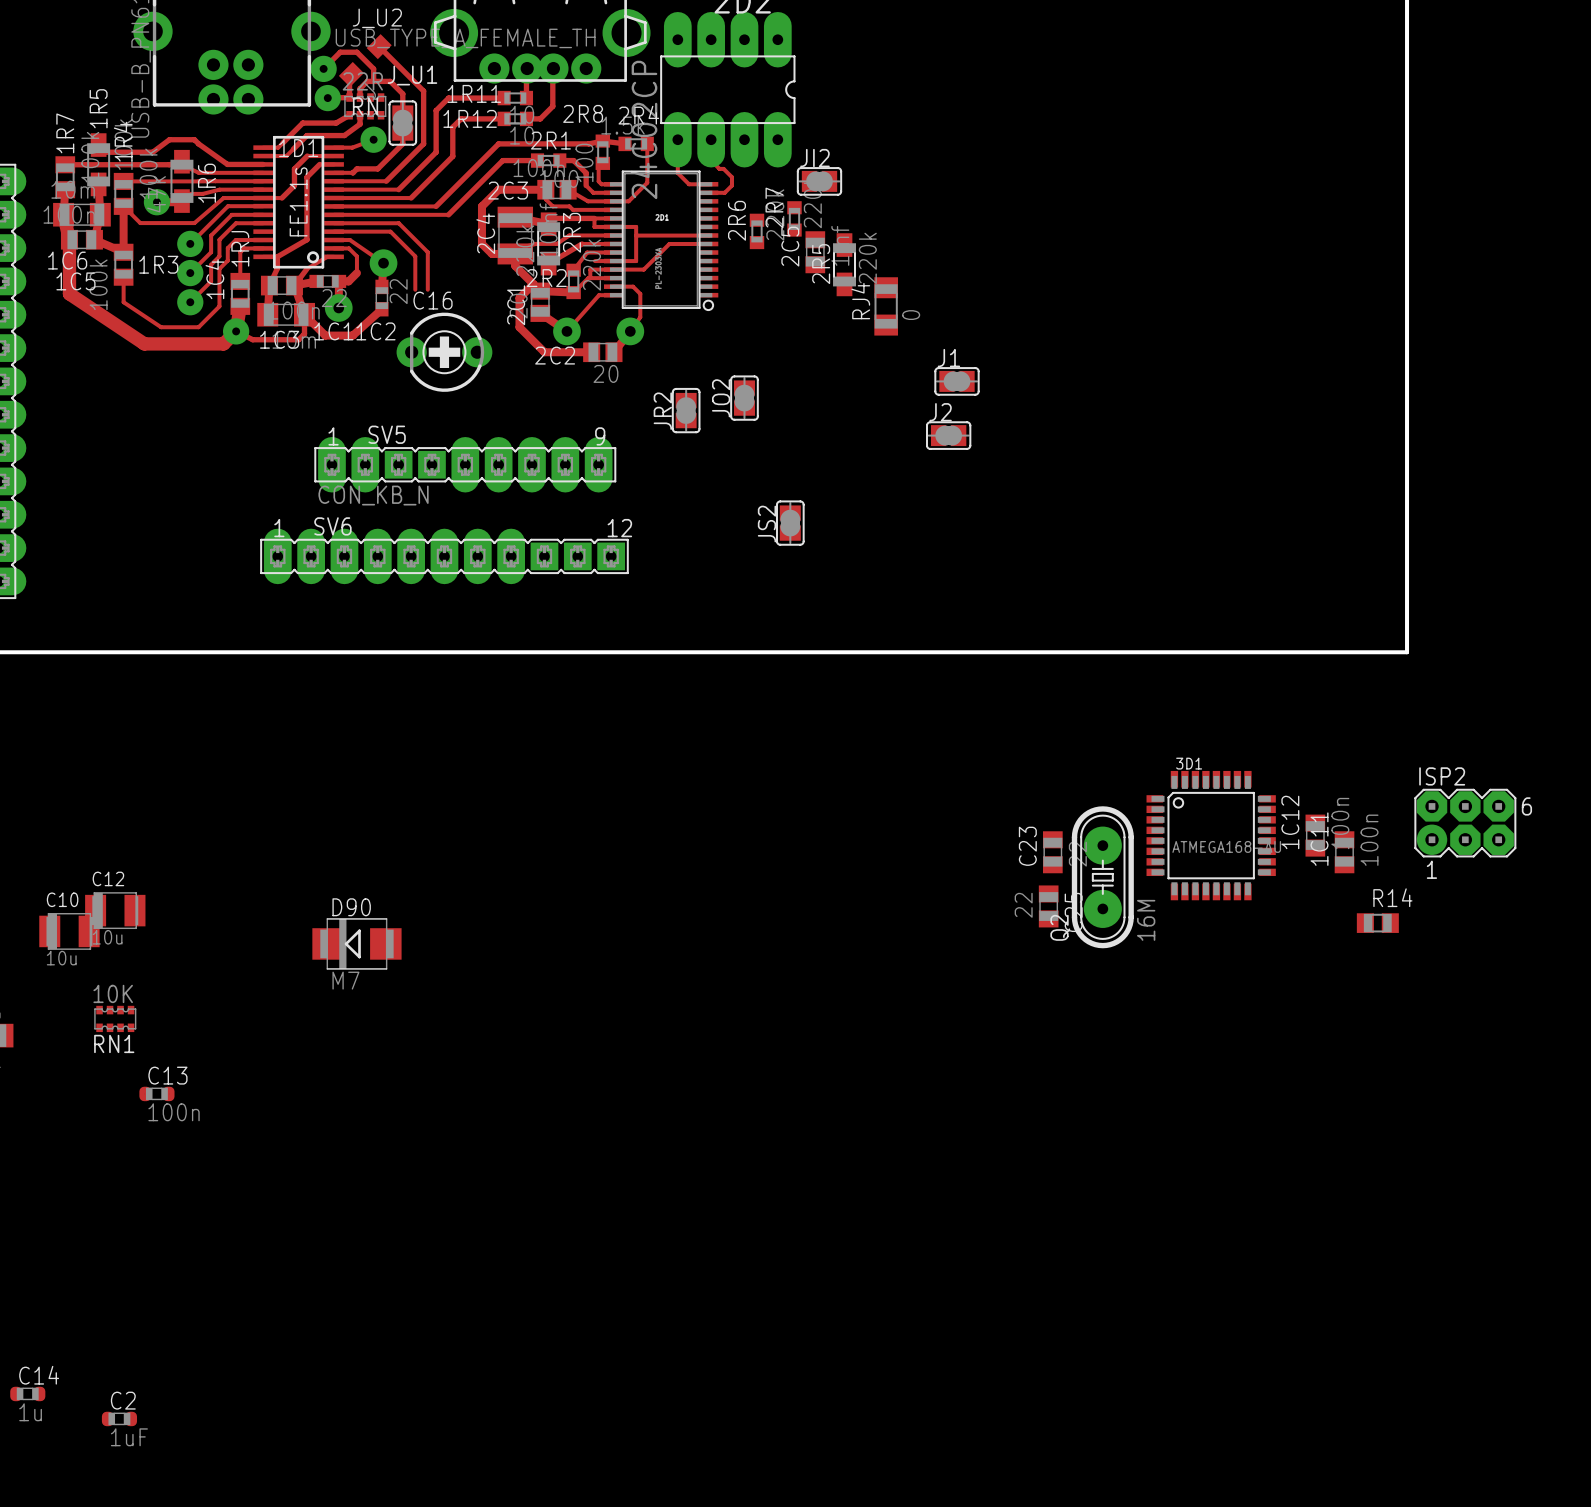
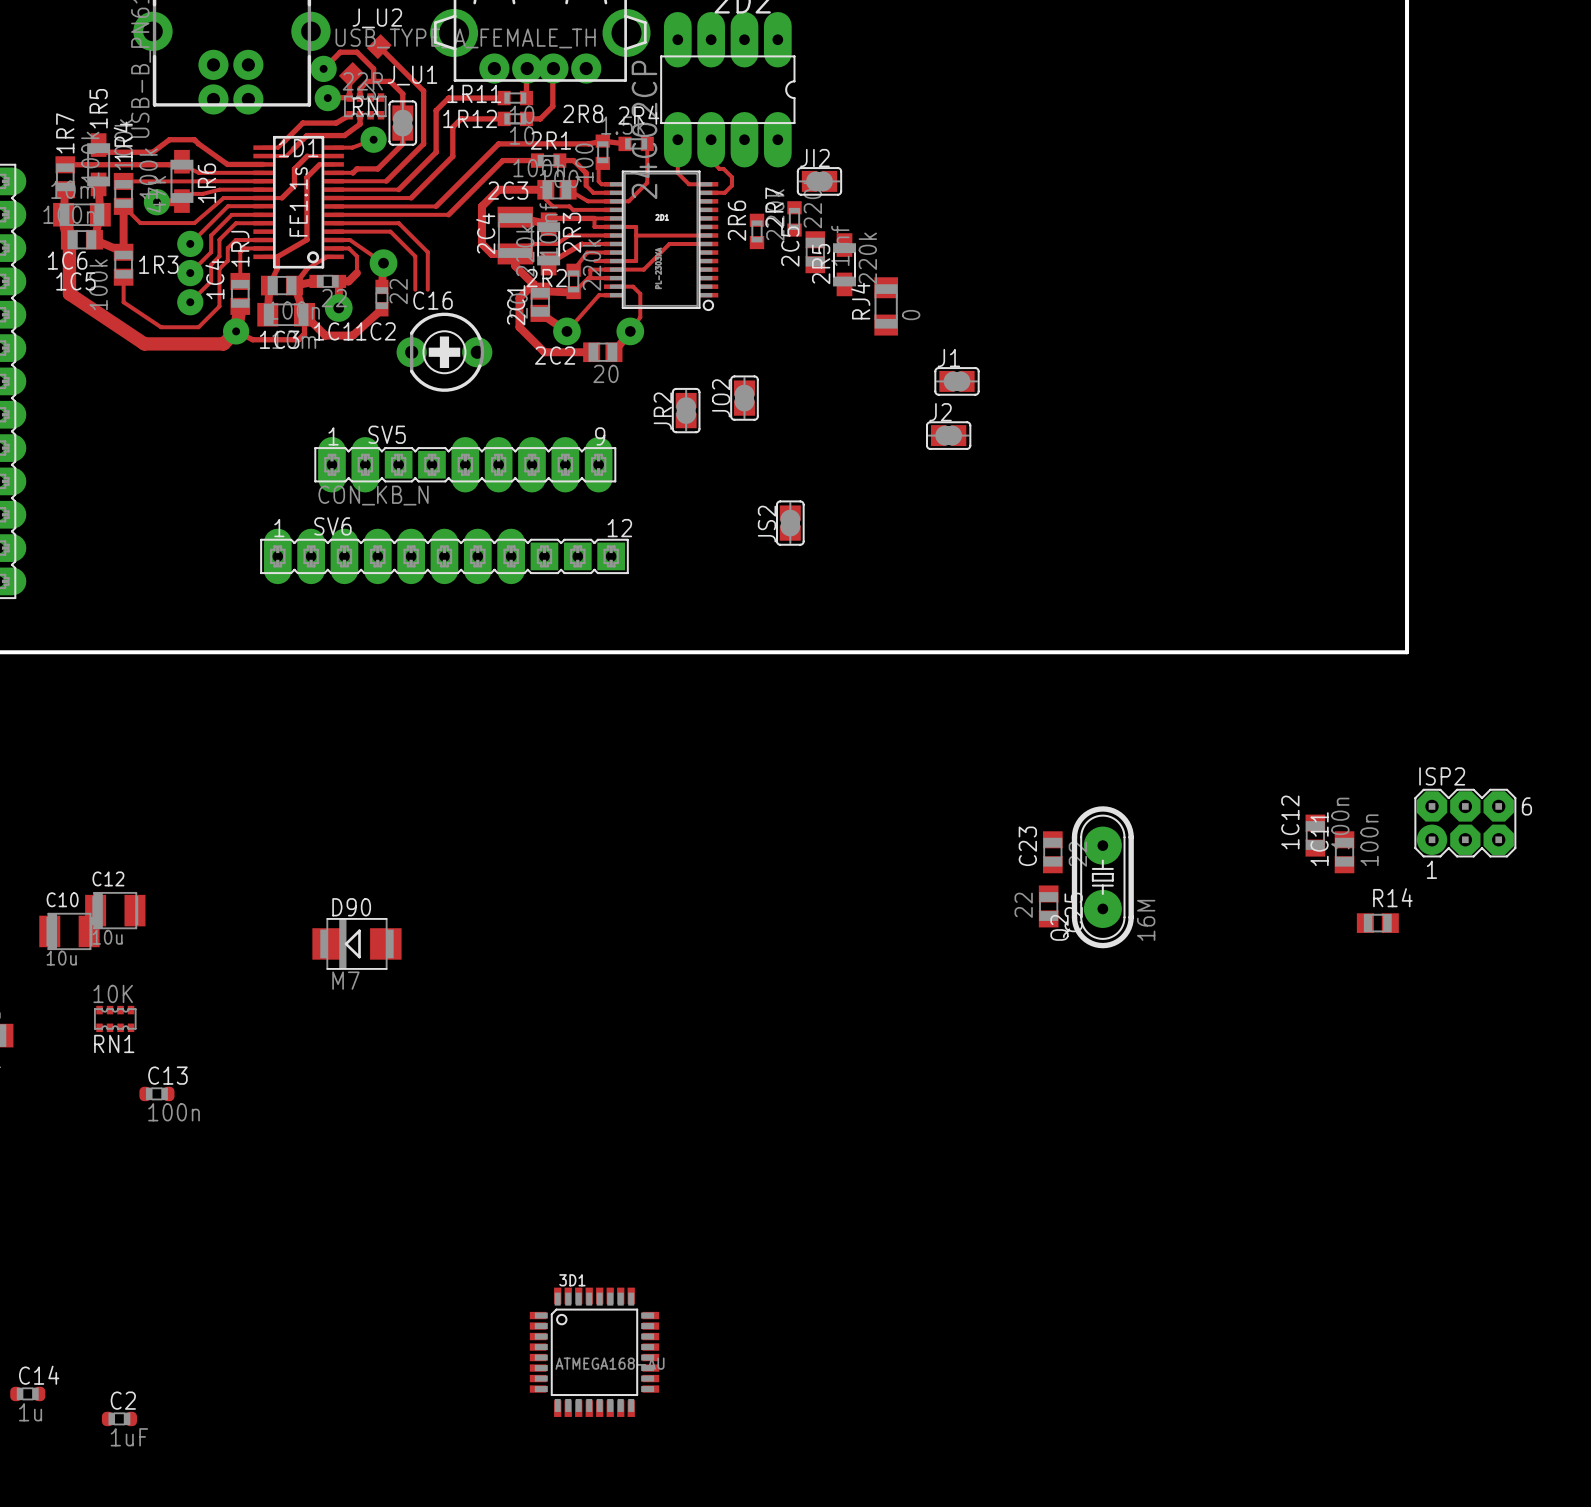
3D1 position: (1211, 835) -> (594, 1352)

